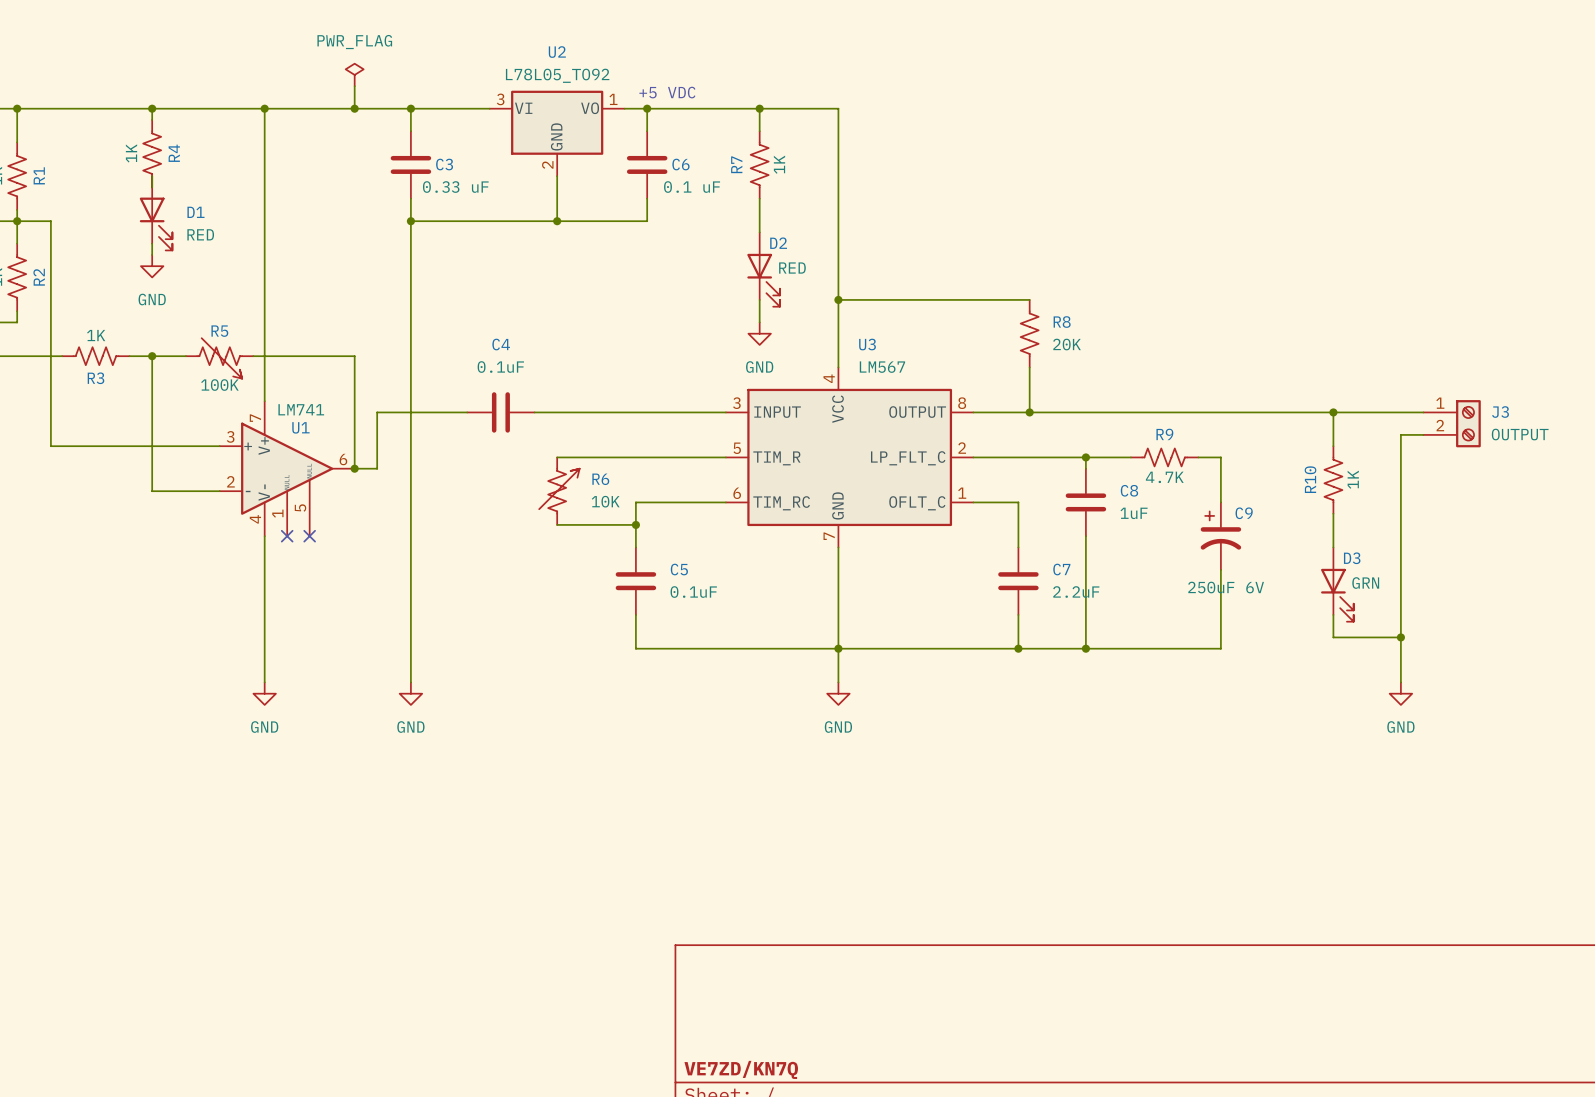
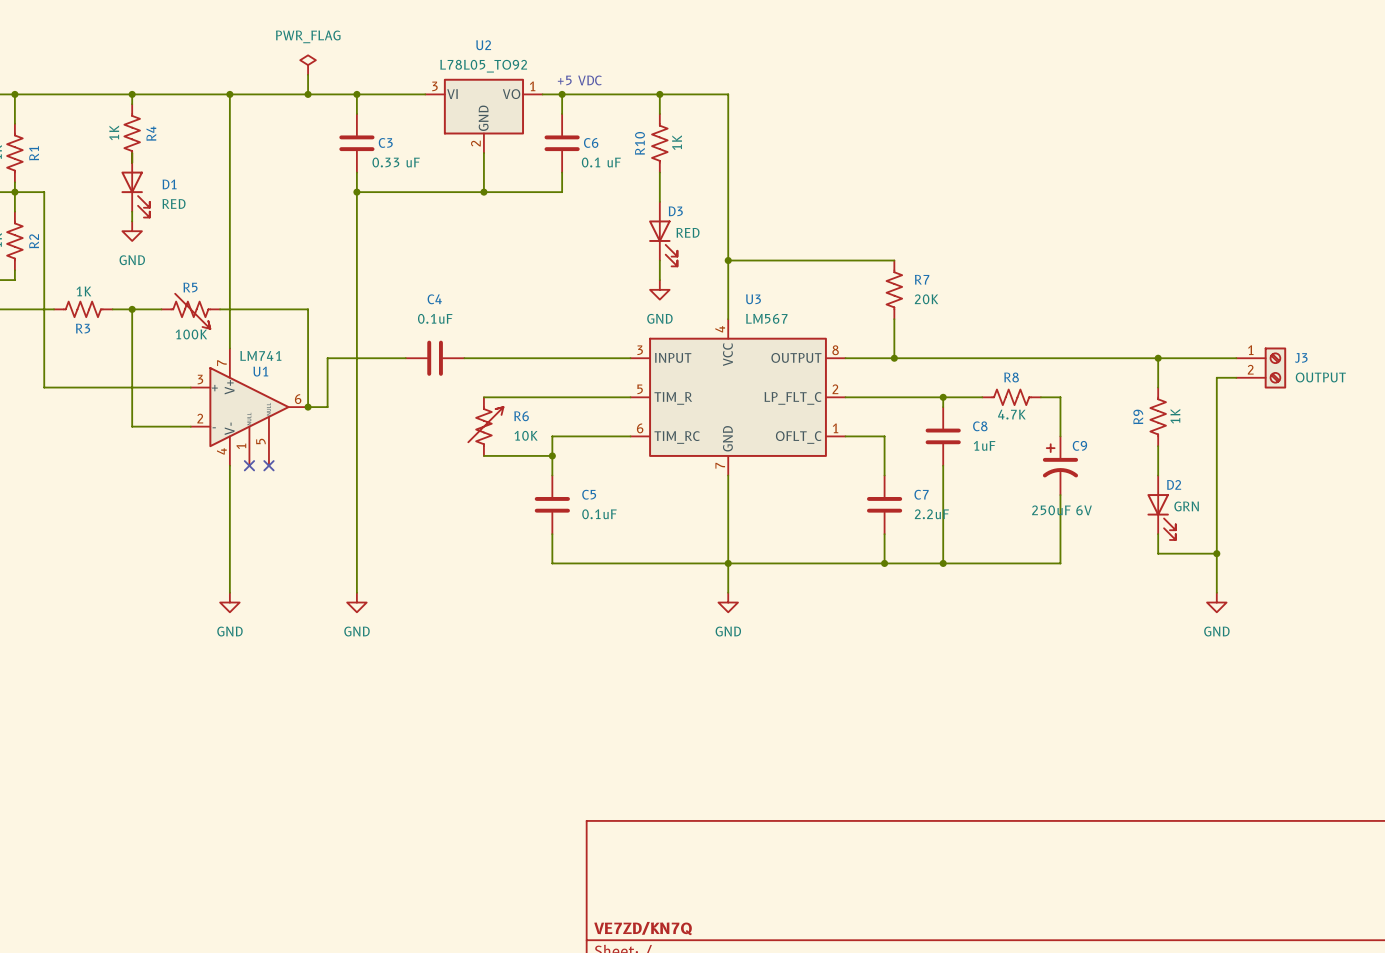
R7 name: R7 (736, 164) -> R10 (639, 143)
D2 name: D2 (778, 243) -> D3 (675, 211)
R8 name: R8 (1062, 322) -> R7 (922, 279)
R9 name: R9 (1164, 434) -> R8 (1011, 377)
R10 name: R10 (1310, 479) -> R9 (1138, 416)
D3 name: D3 (1352, 558) -> D2 (1174, 484)

